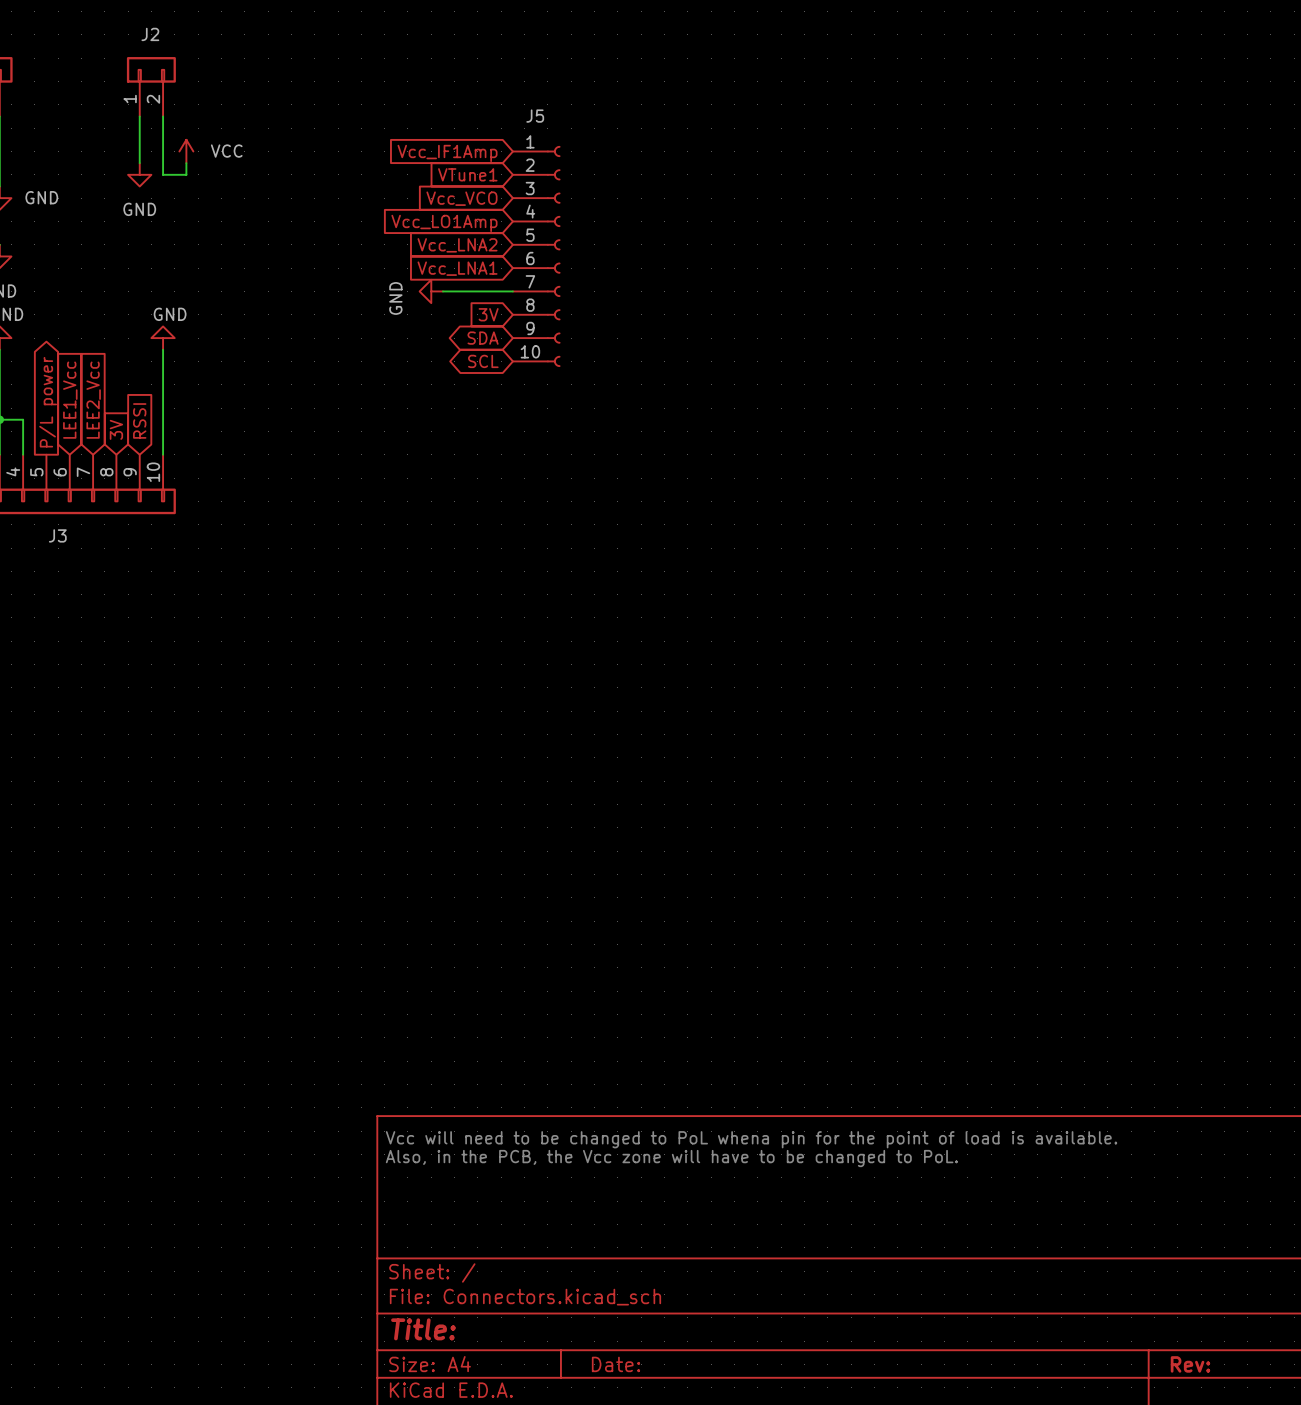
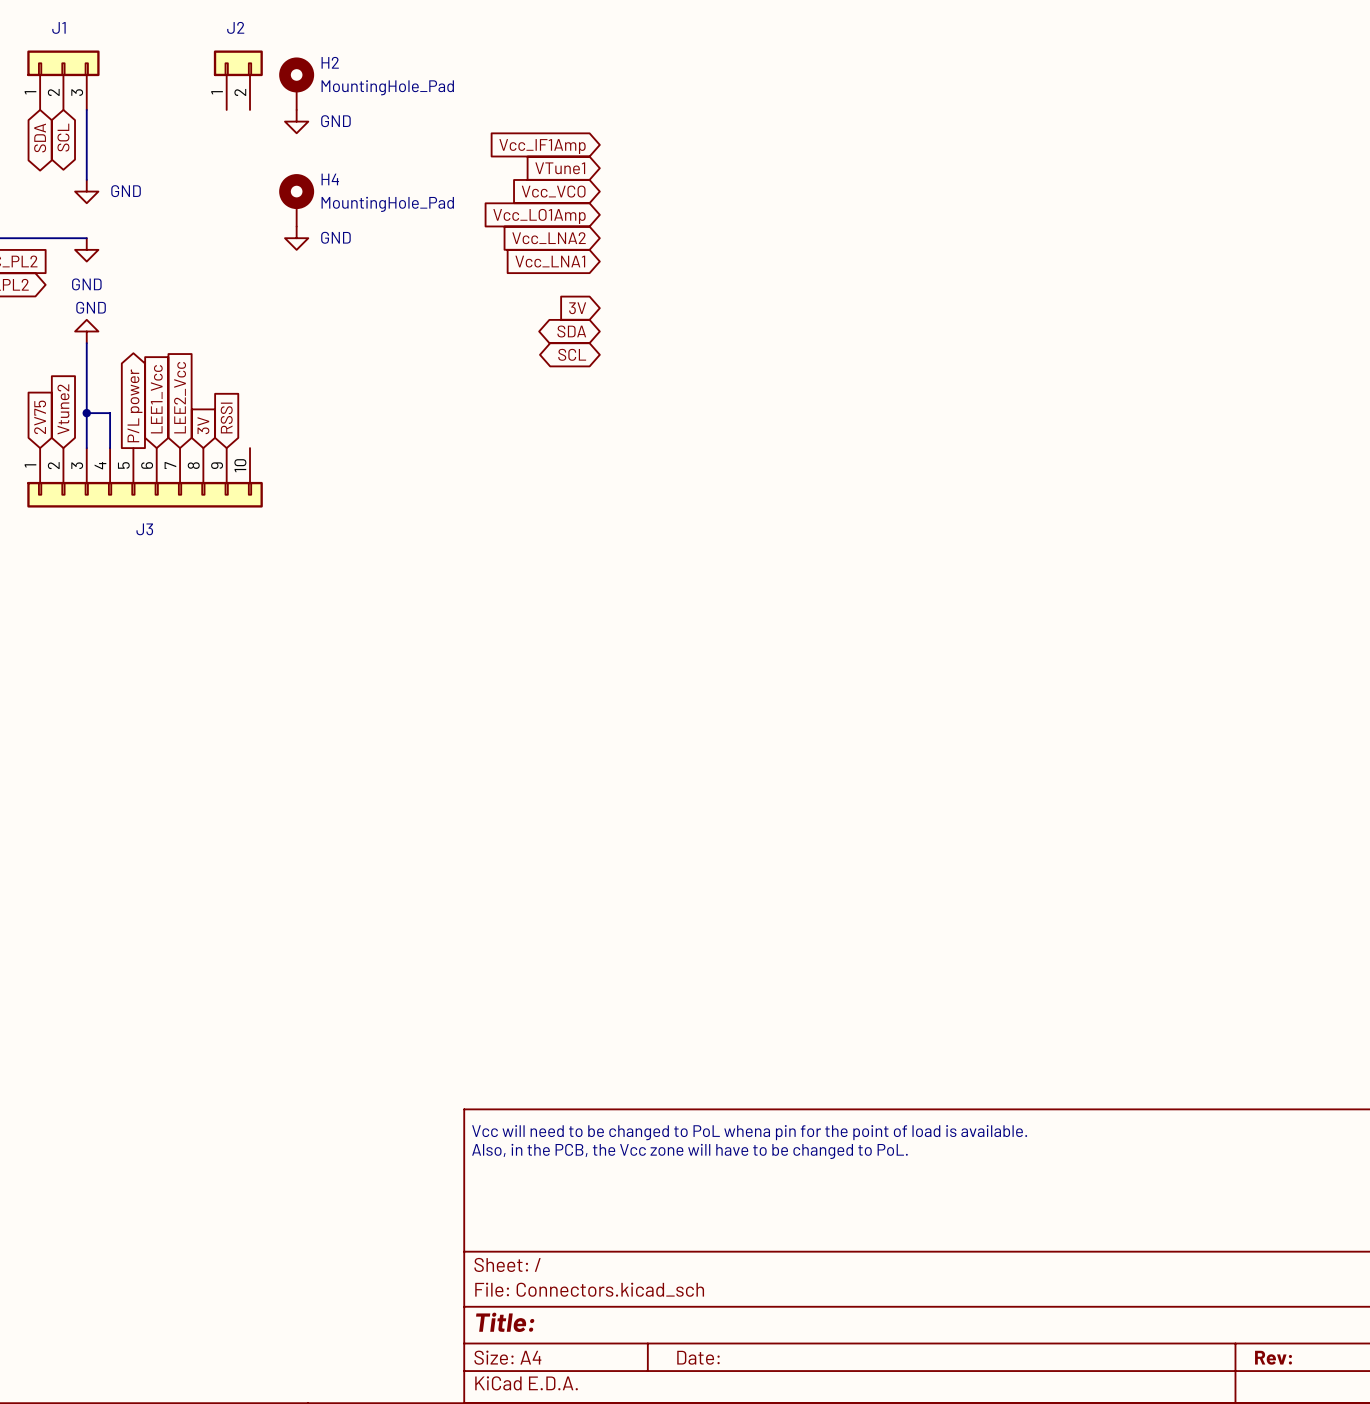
H2: none -> MountingHole_Pad (296, 83)
wire: (139, 116) (139, 163) -> none
wire: (163, 116) (163, 174) (186, 174) (186, 163) -> none
power symbol: none -> GND (296, 121)
power symbol: VCC (186, 151) -> none
power symbol: GND (139, 174) -> none
H4: none -> MountingHole_Pad (296, 200)
power symbol: none -> GND (296, 238)
J5: (536, 256) -> none
power symbol: GND (431, 291) -> none
wire: (442, 291) (512, 291) -> none
power symbol: GND (163, 338) -> none
wire: (163, 349) (163, 454) -> none

